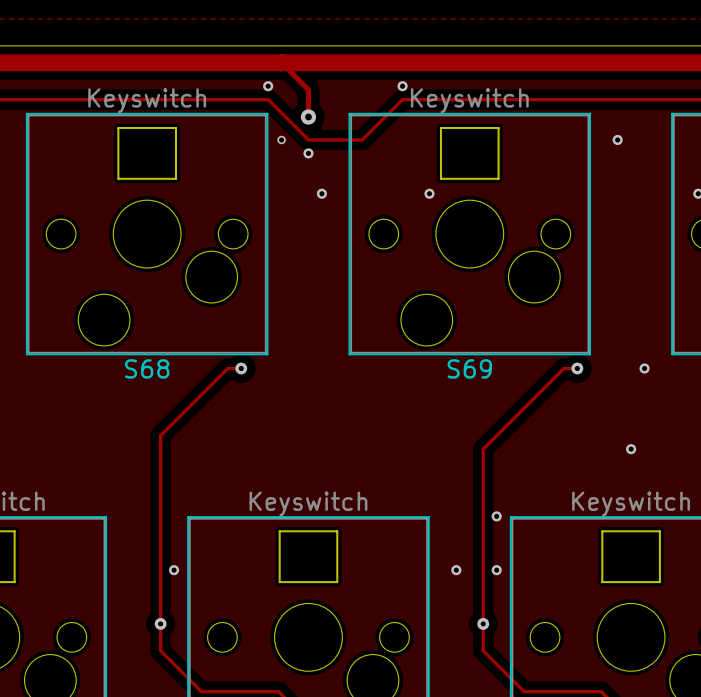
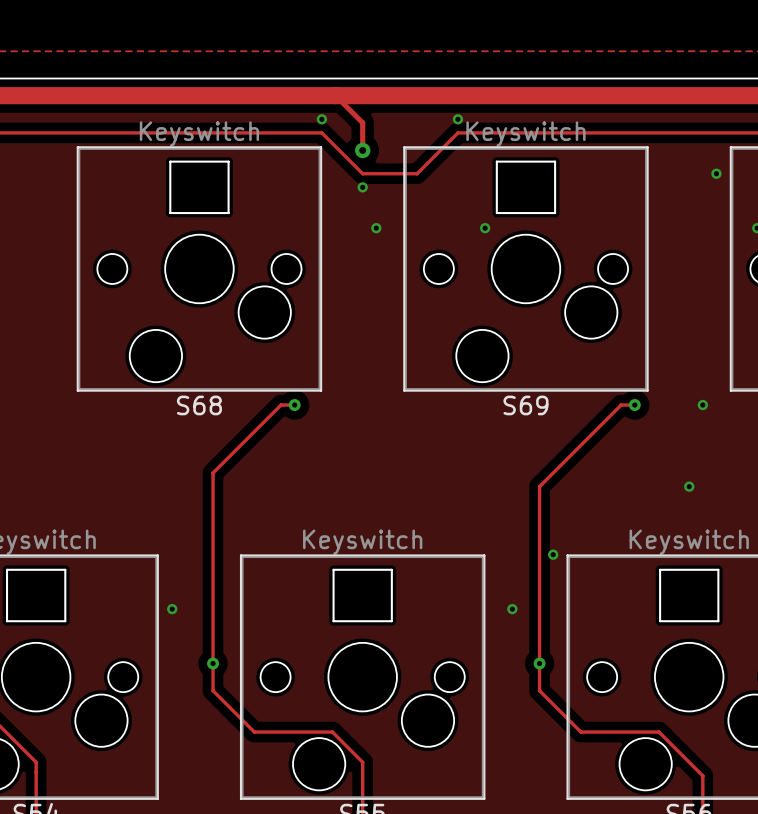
via: (281, 139) -> none
via position: (617, 139) -> (716, 173)
via position: (174, 570) -> (172, 609)
via: (496, 570) -> none

